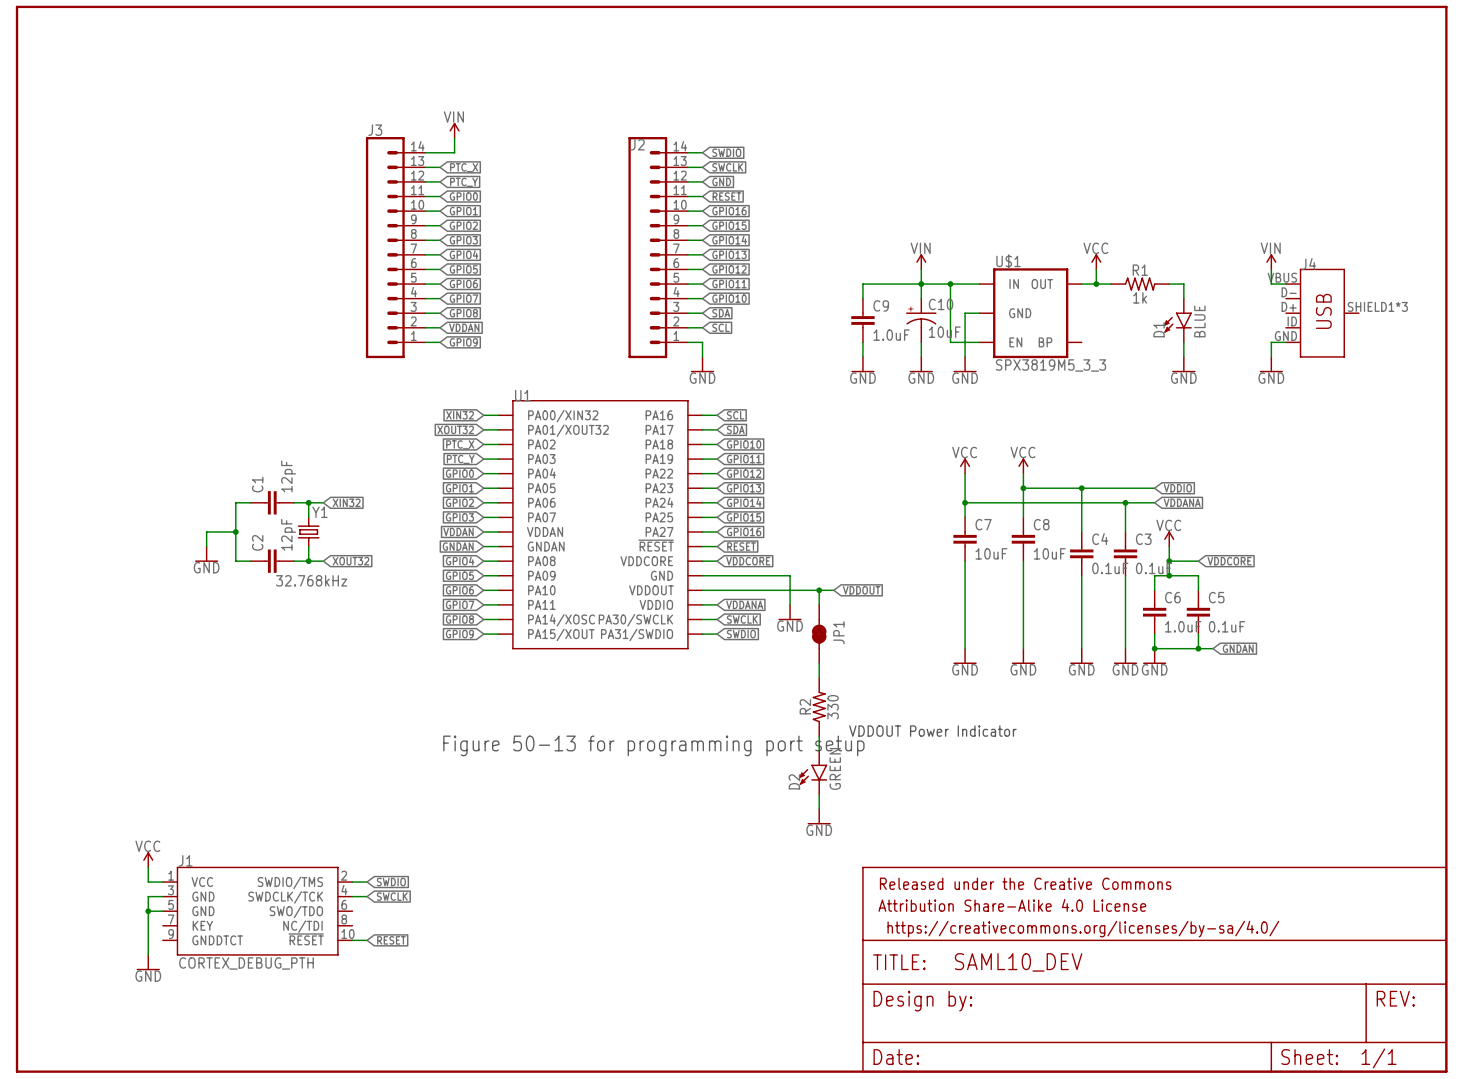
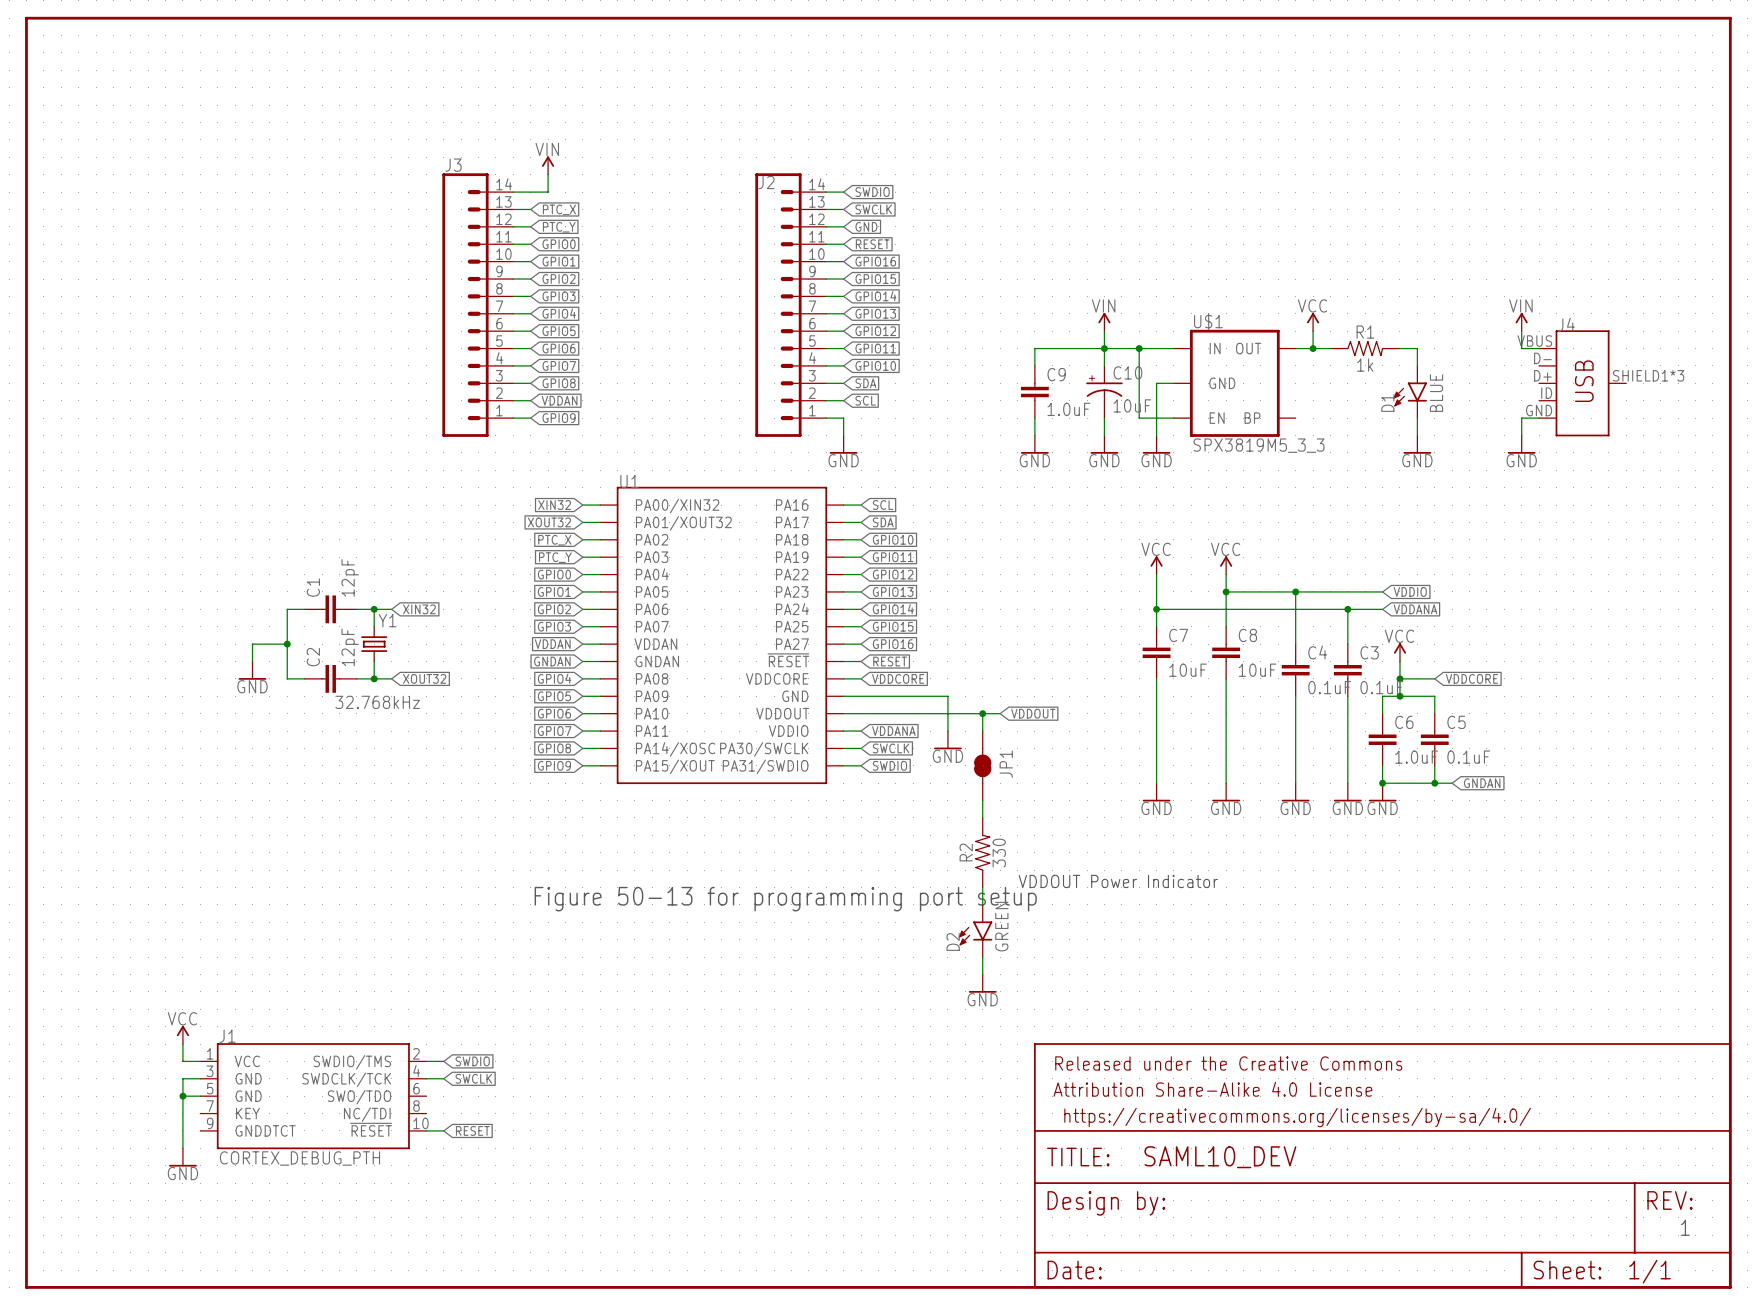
text: none -> 1 (1685, 1227)

